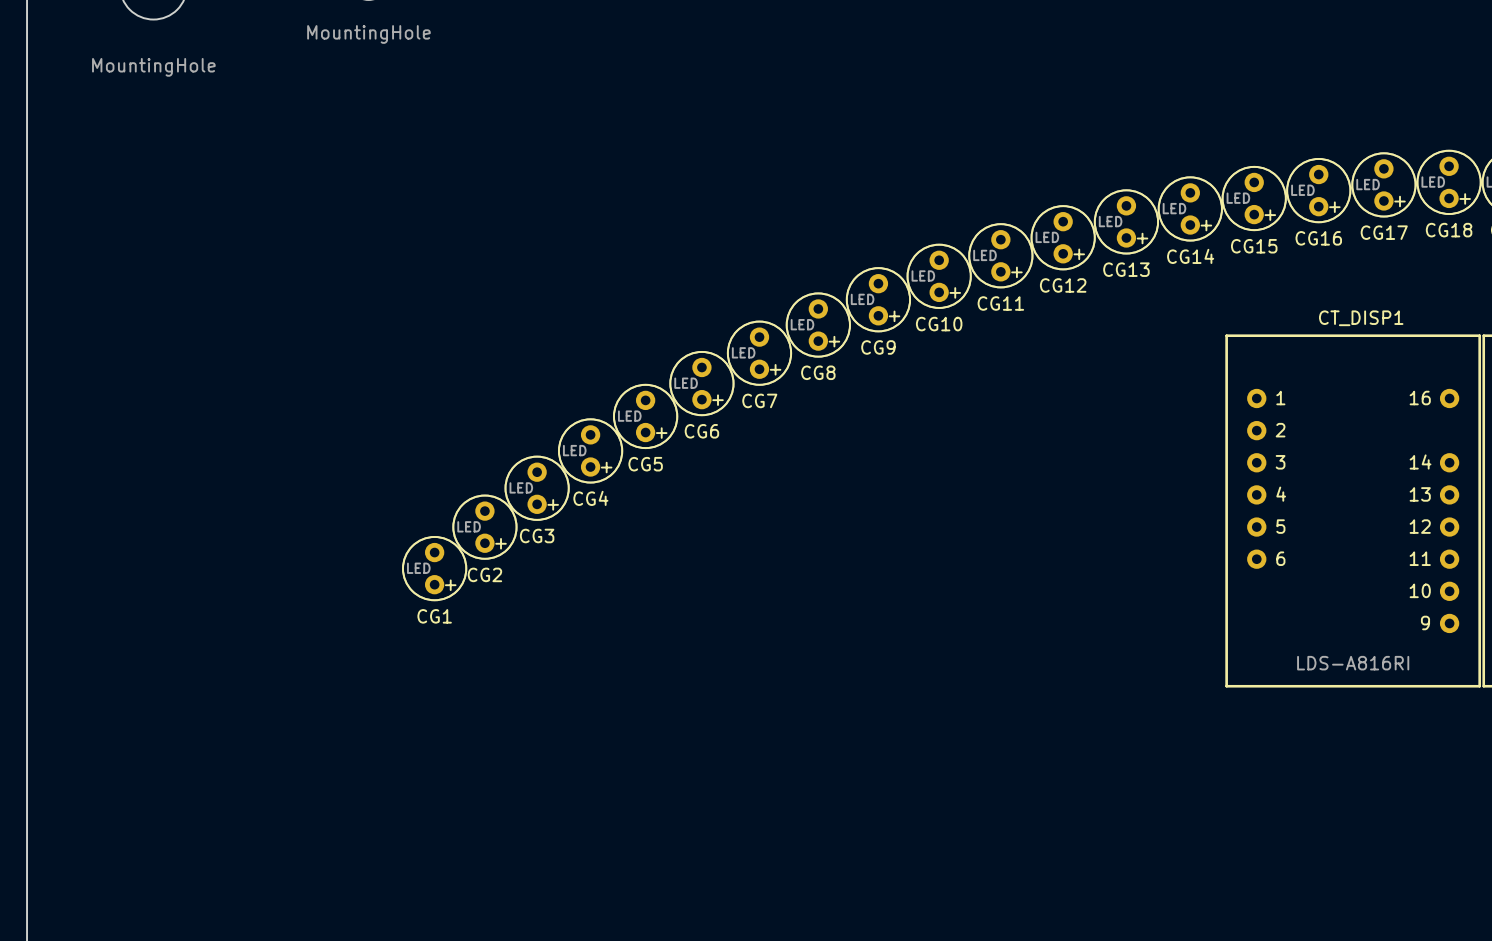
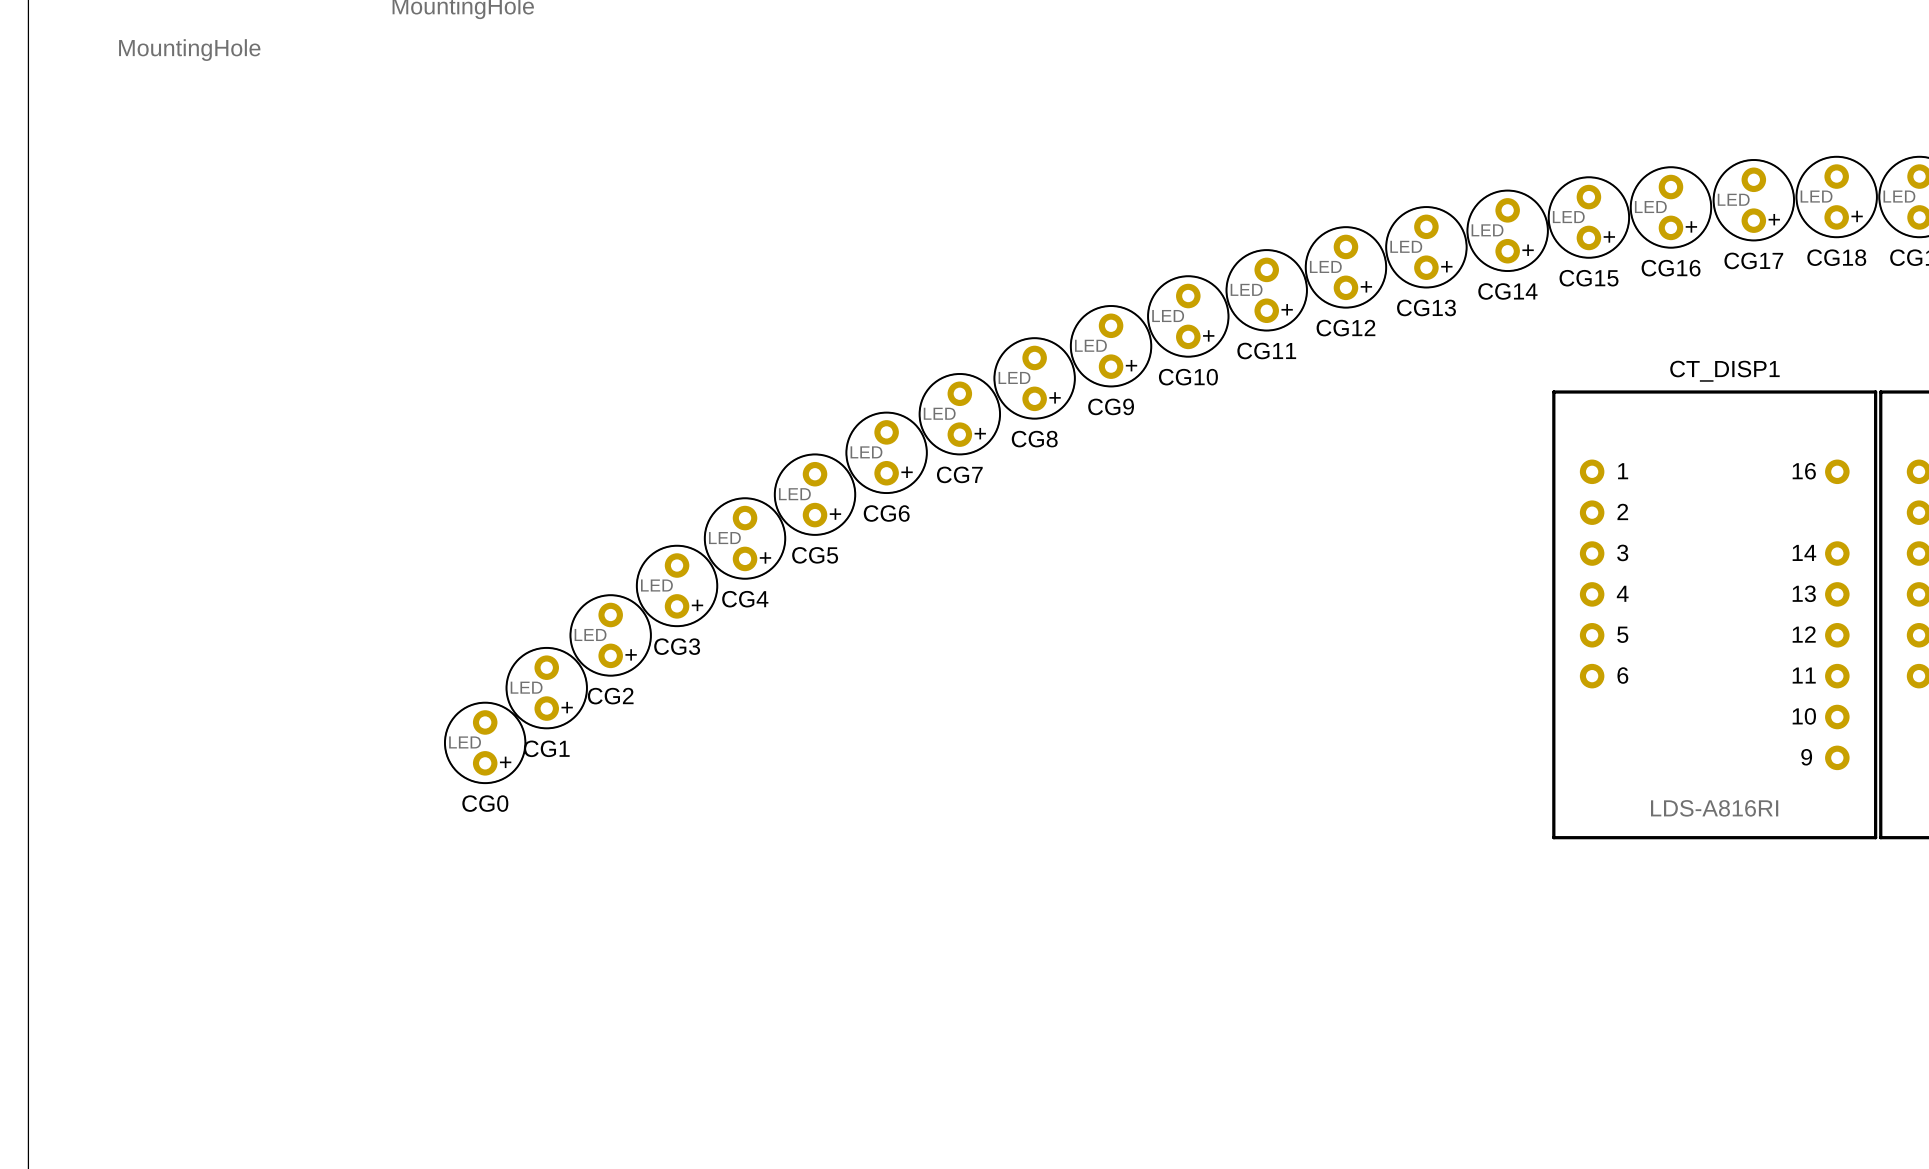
CG0: none -> LED (485, 742)

